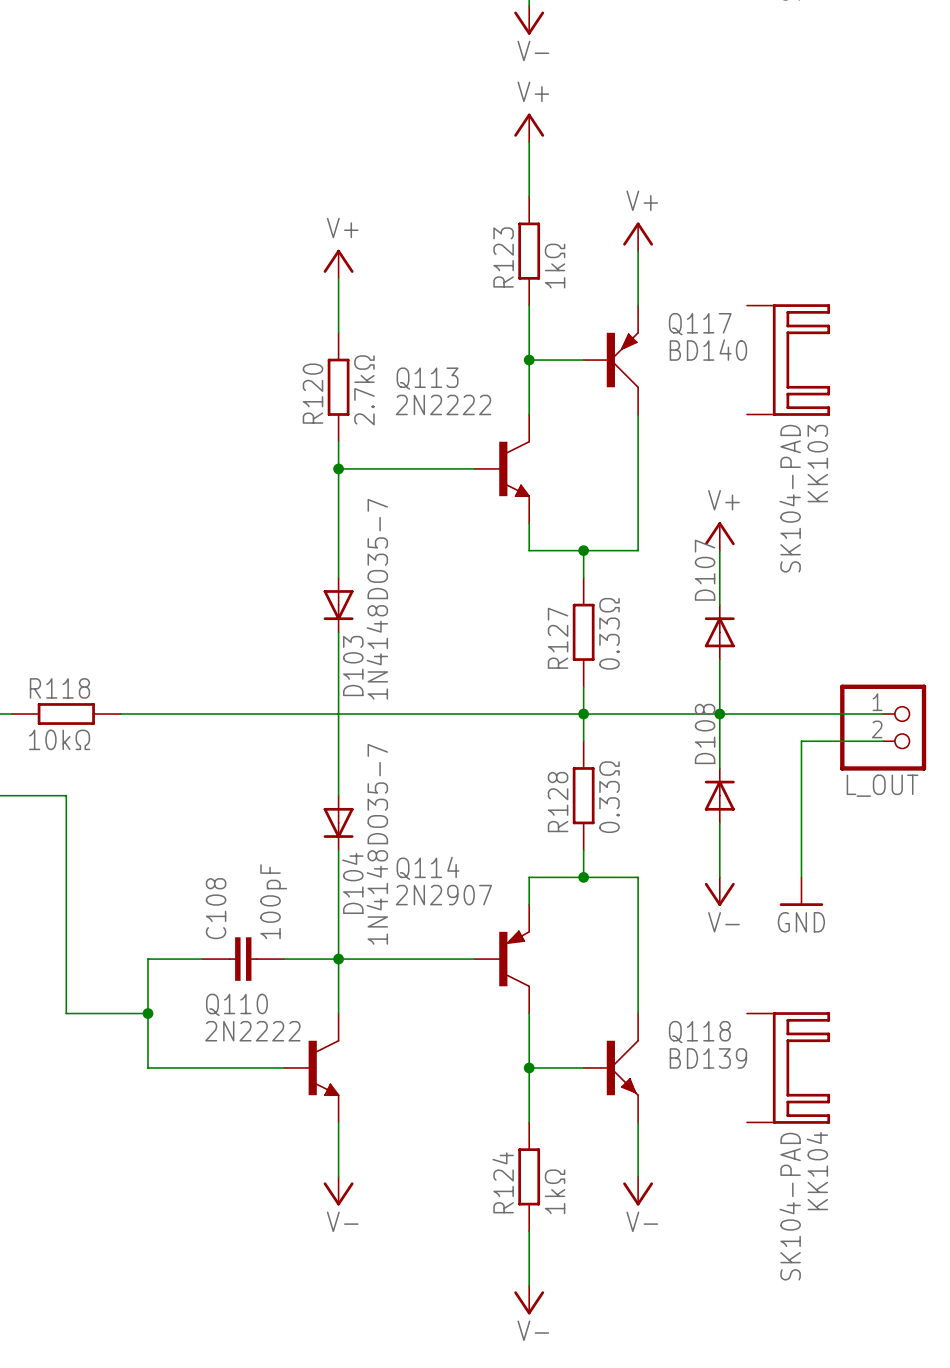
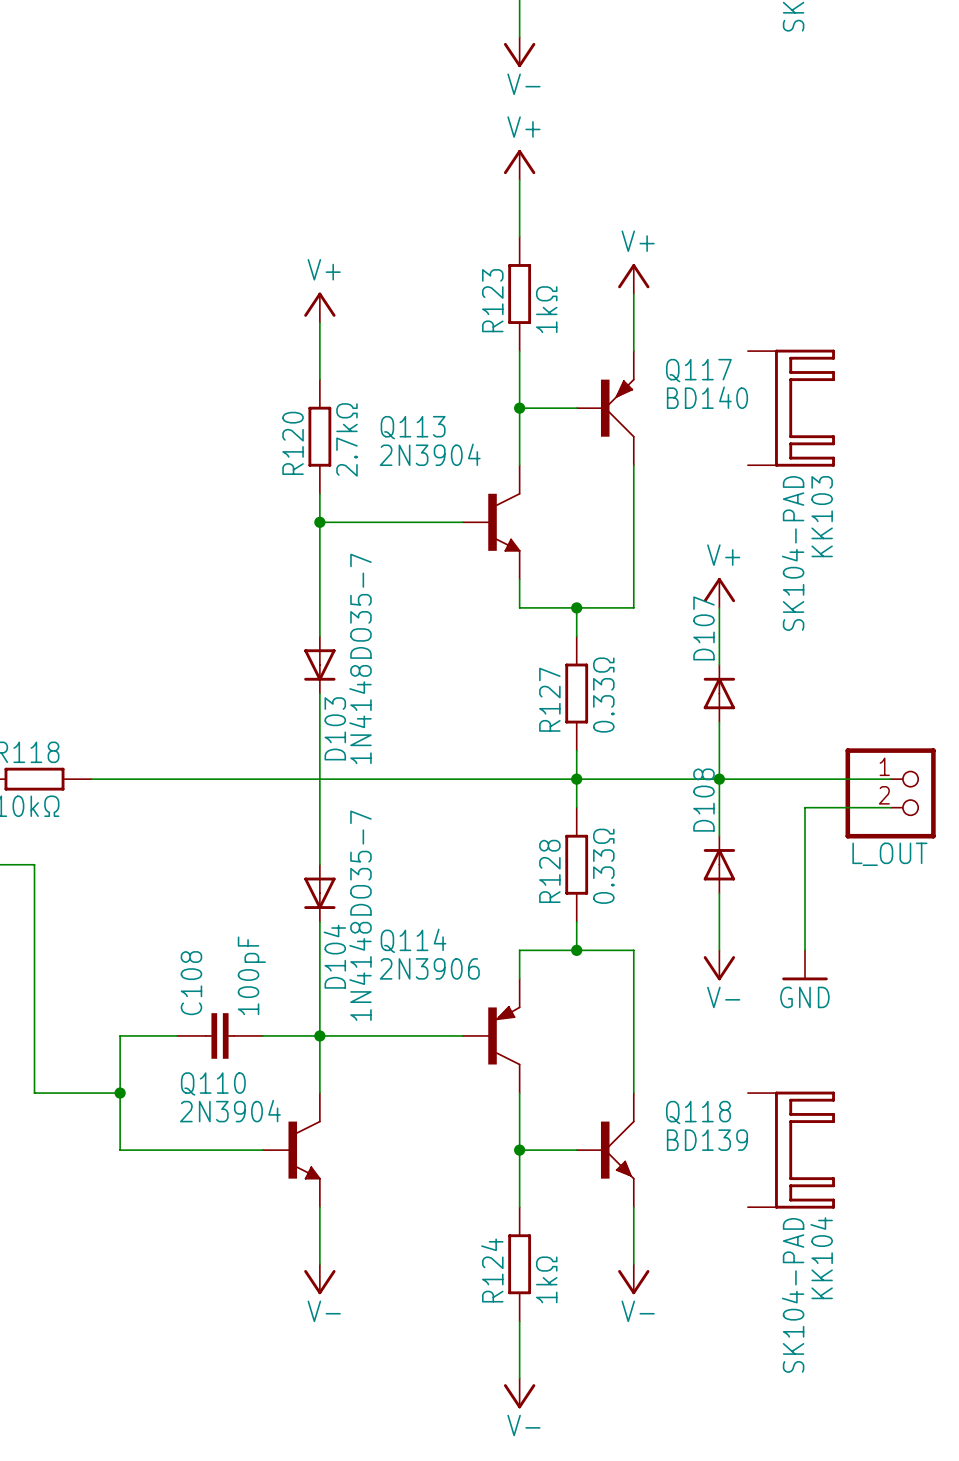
Q113 value: 2N2222 (443, 404) -> 2N3904 (430, 454)
Q114 value: 2N2907 (443, 895) -> 2N3906 (429, 968)
Q110 value: 2N2222 (252, 1031) -> 2N3904 (230, 1111)

